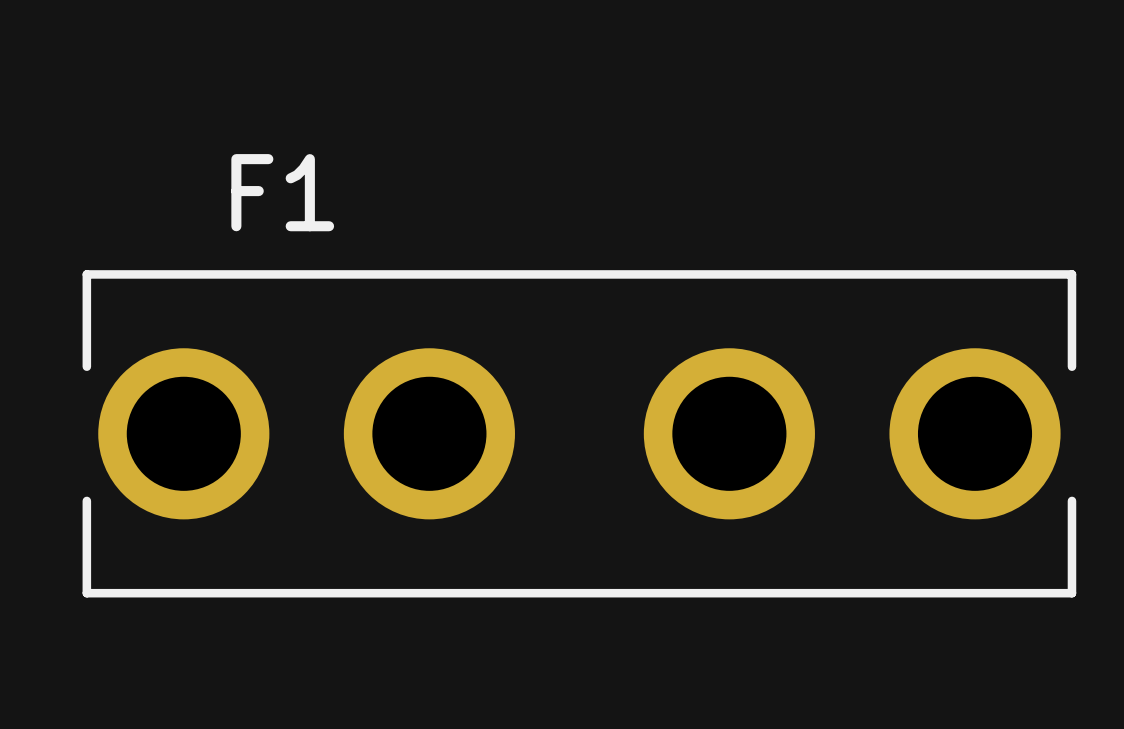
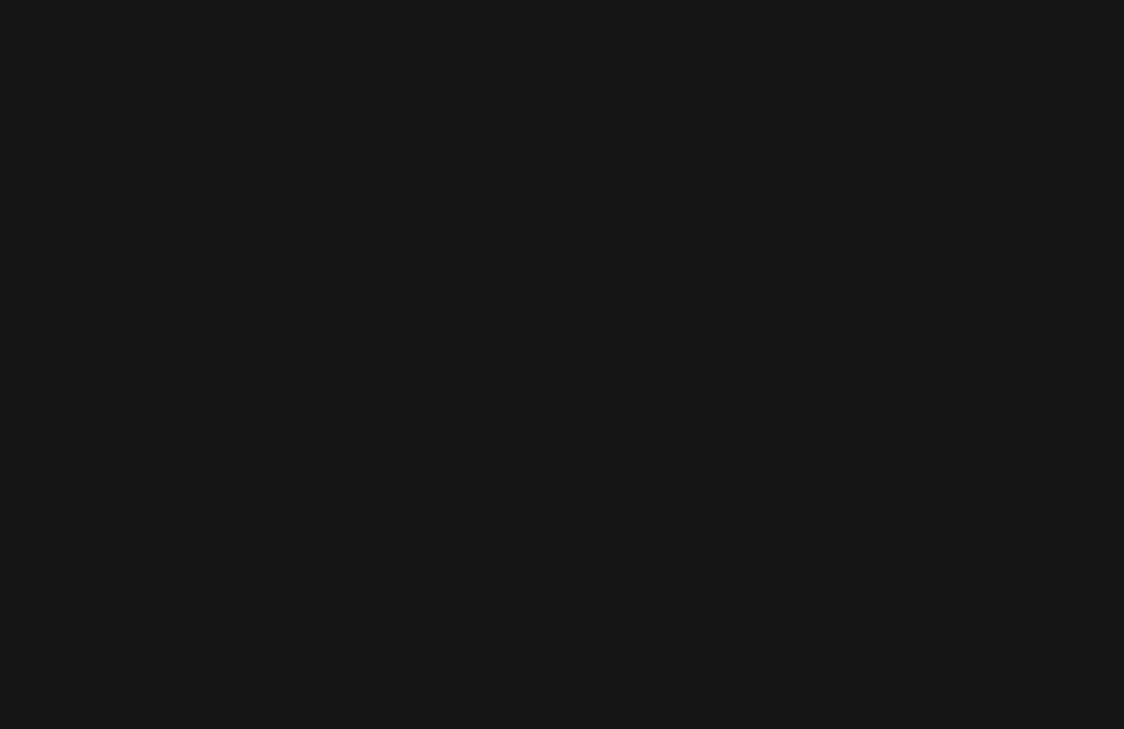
F1: (579, 433) -> none

